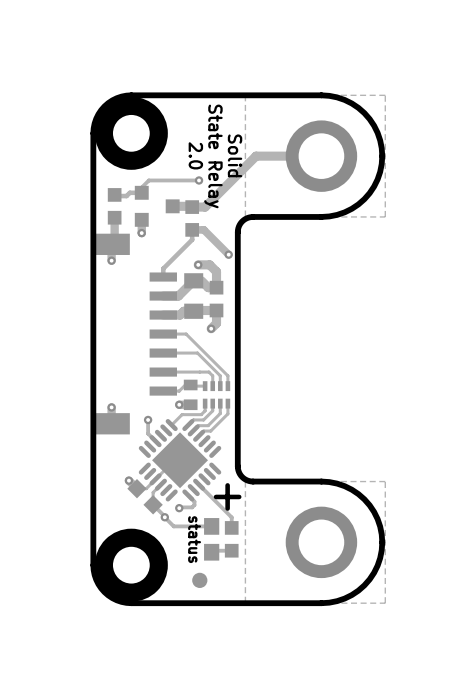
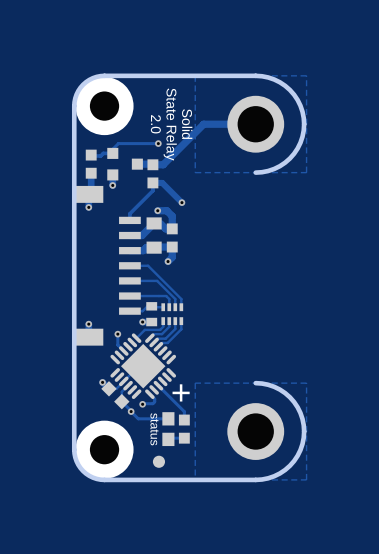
board edge: (321, 216) (251, 217) (242, 221) (237, 232) (238, 470) (242, 477) (251, 481) (321, 481) -> none

